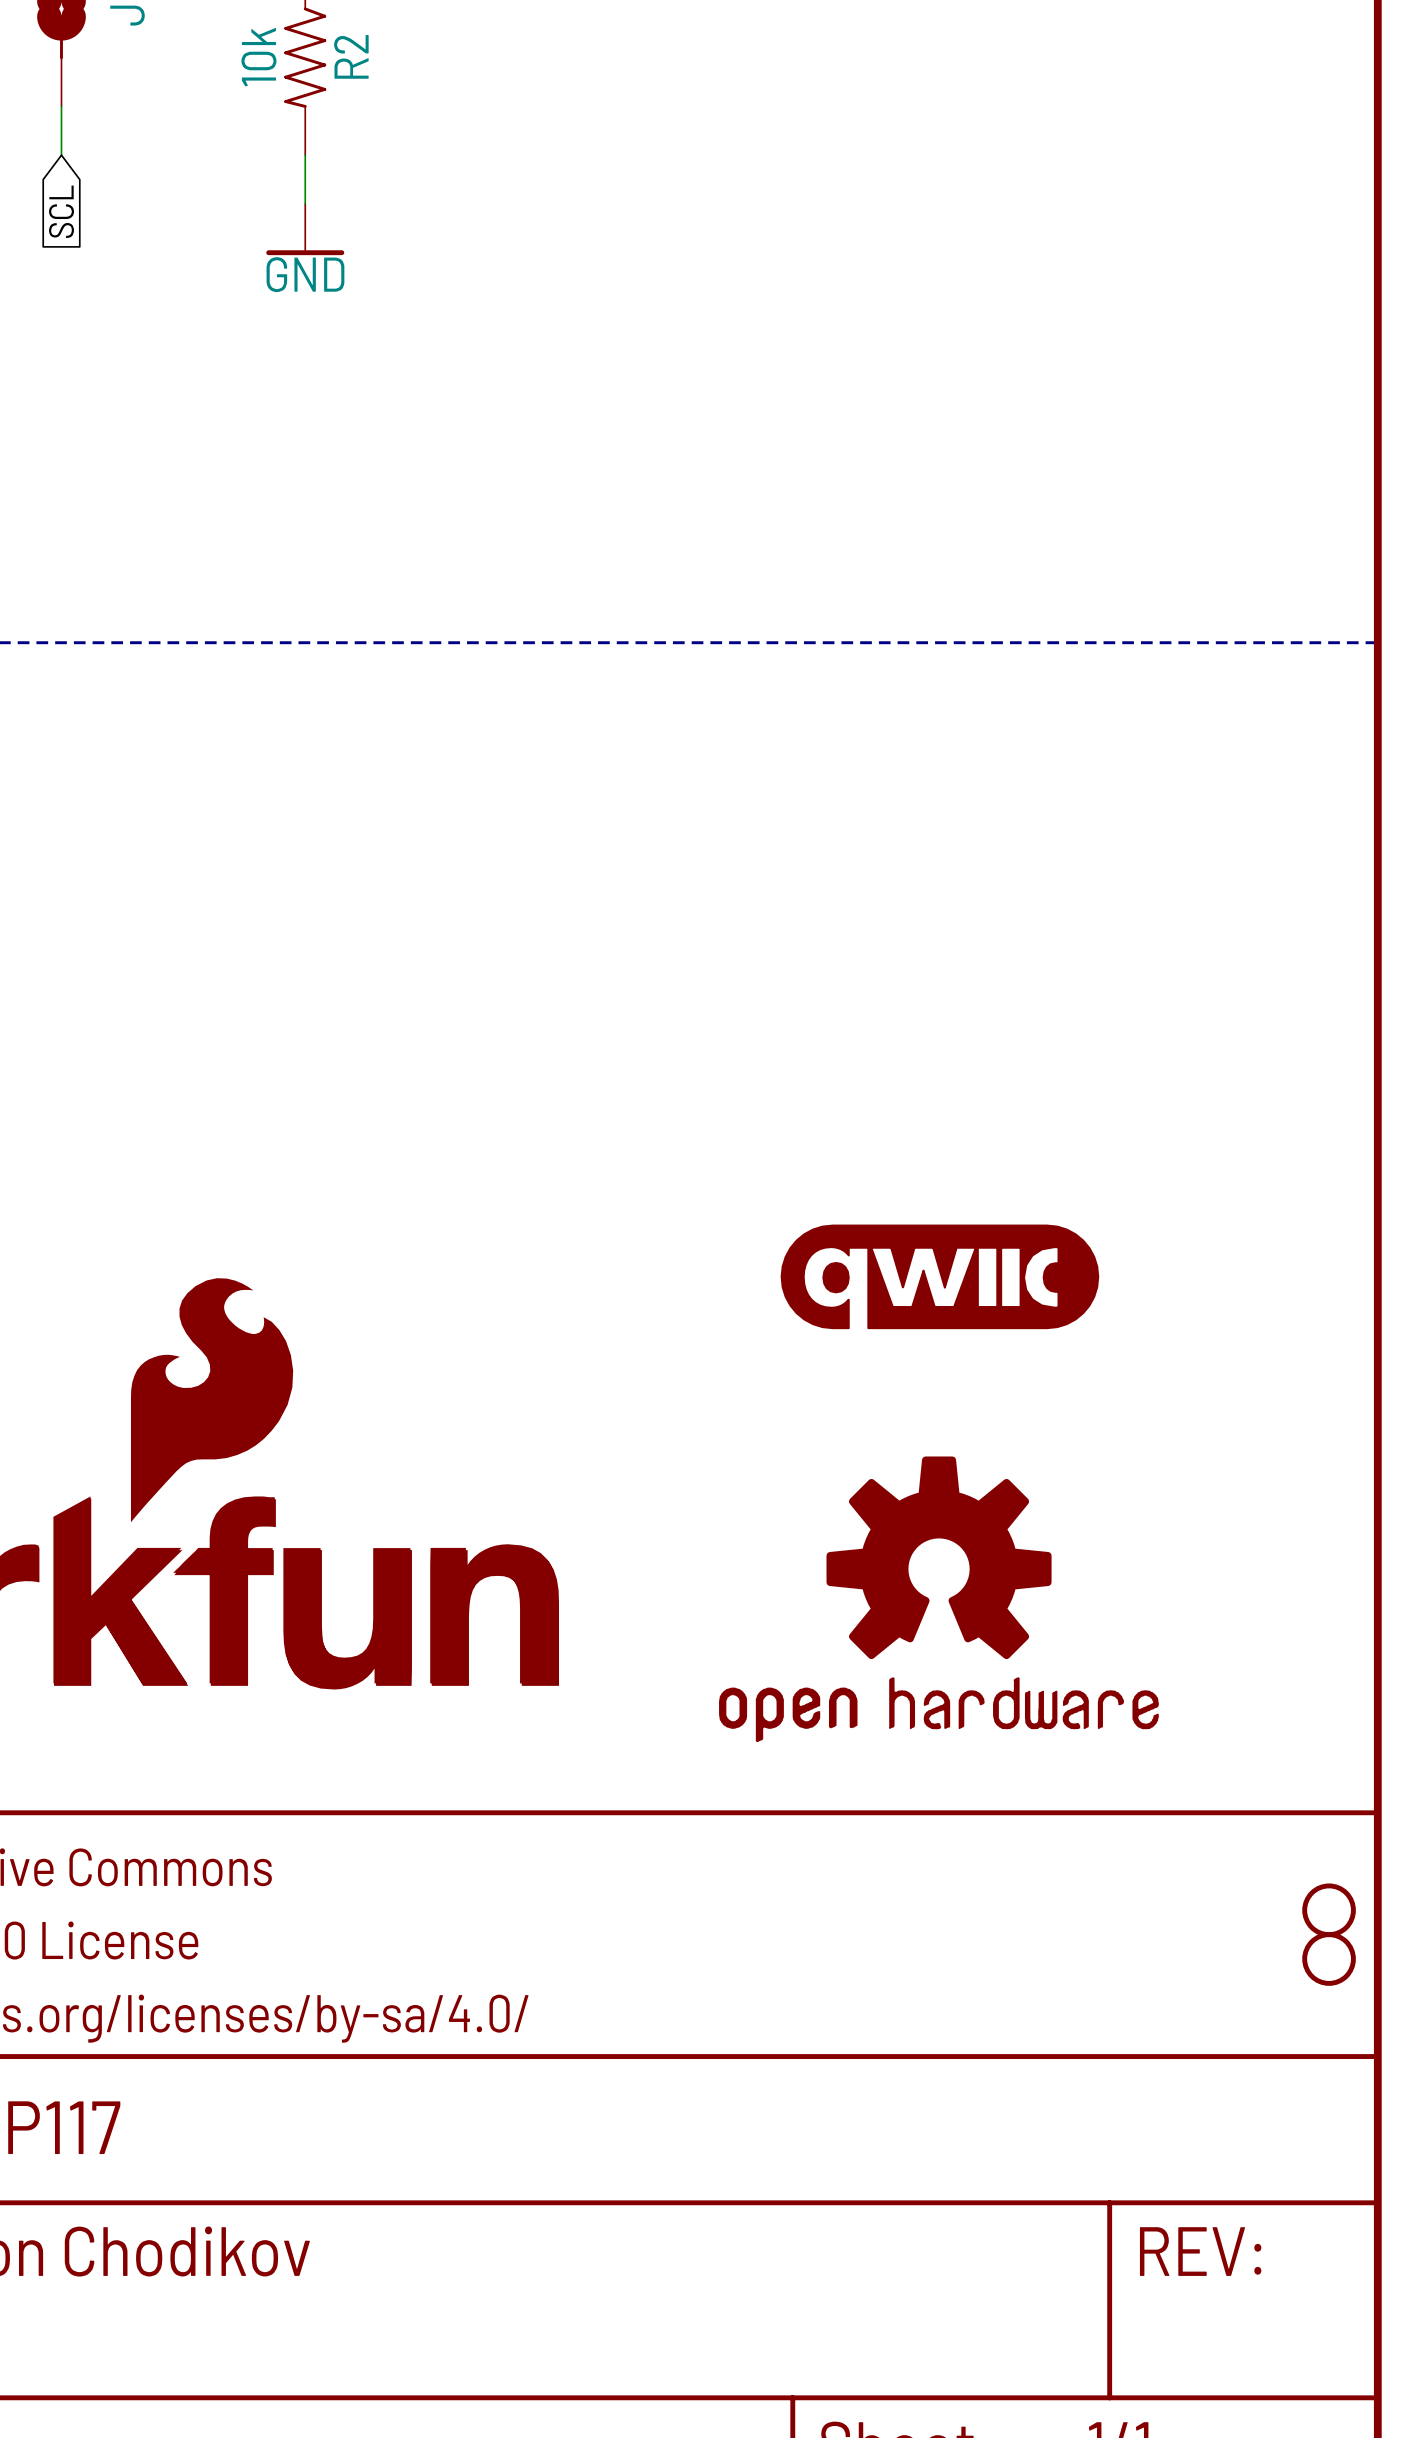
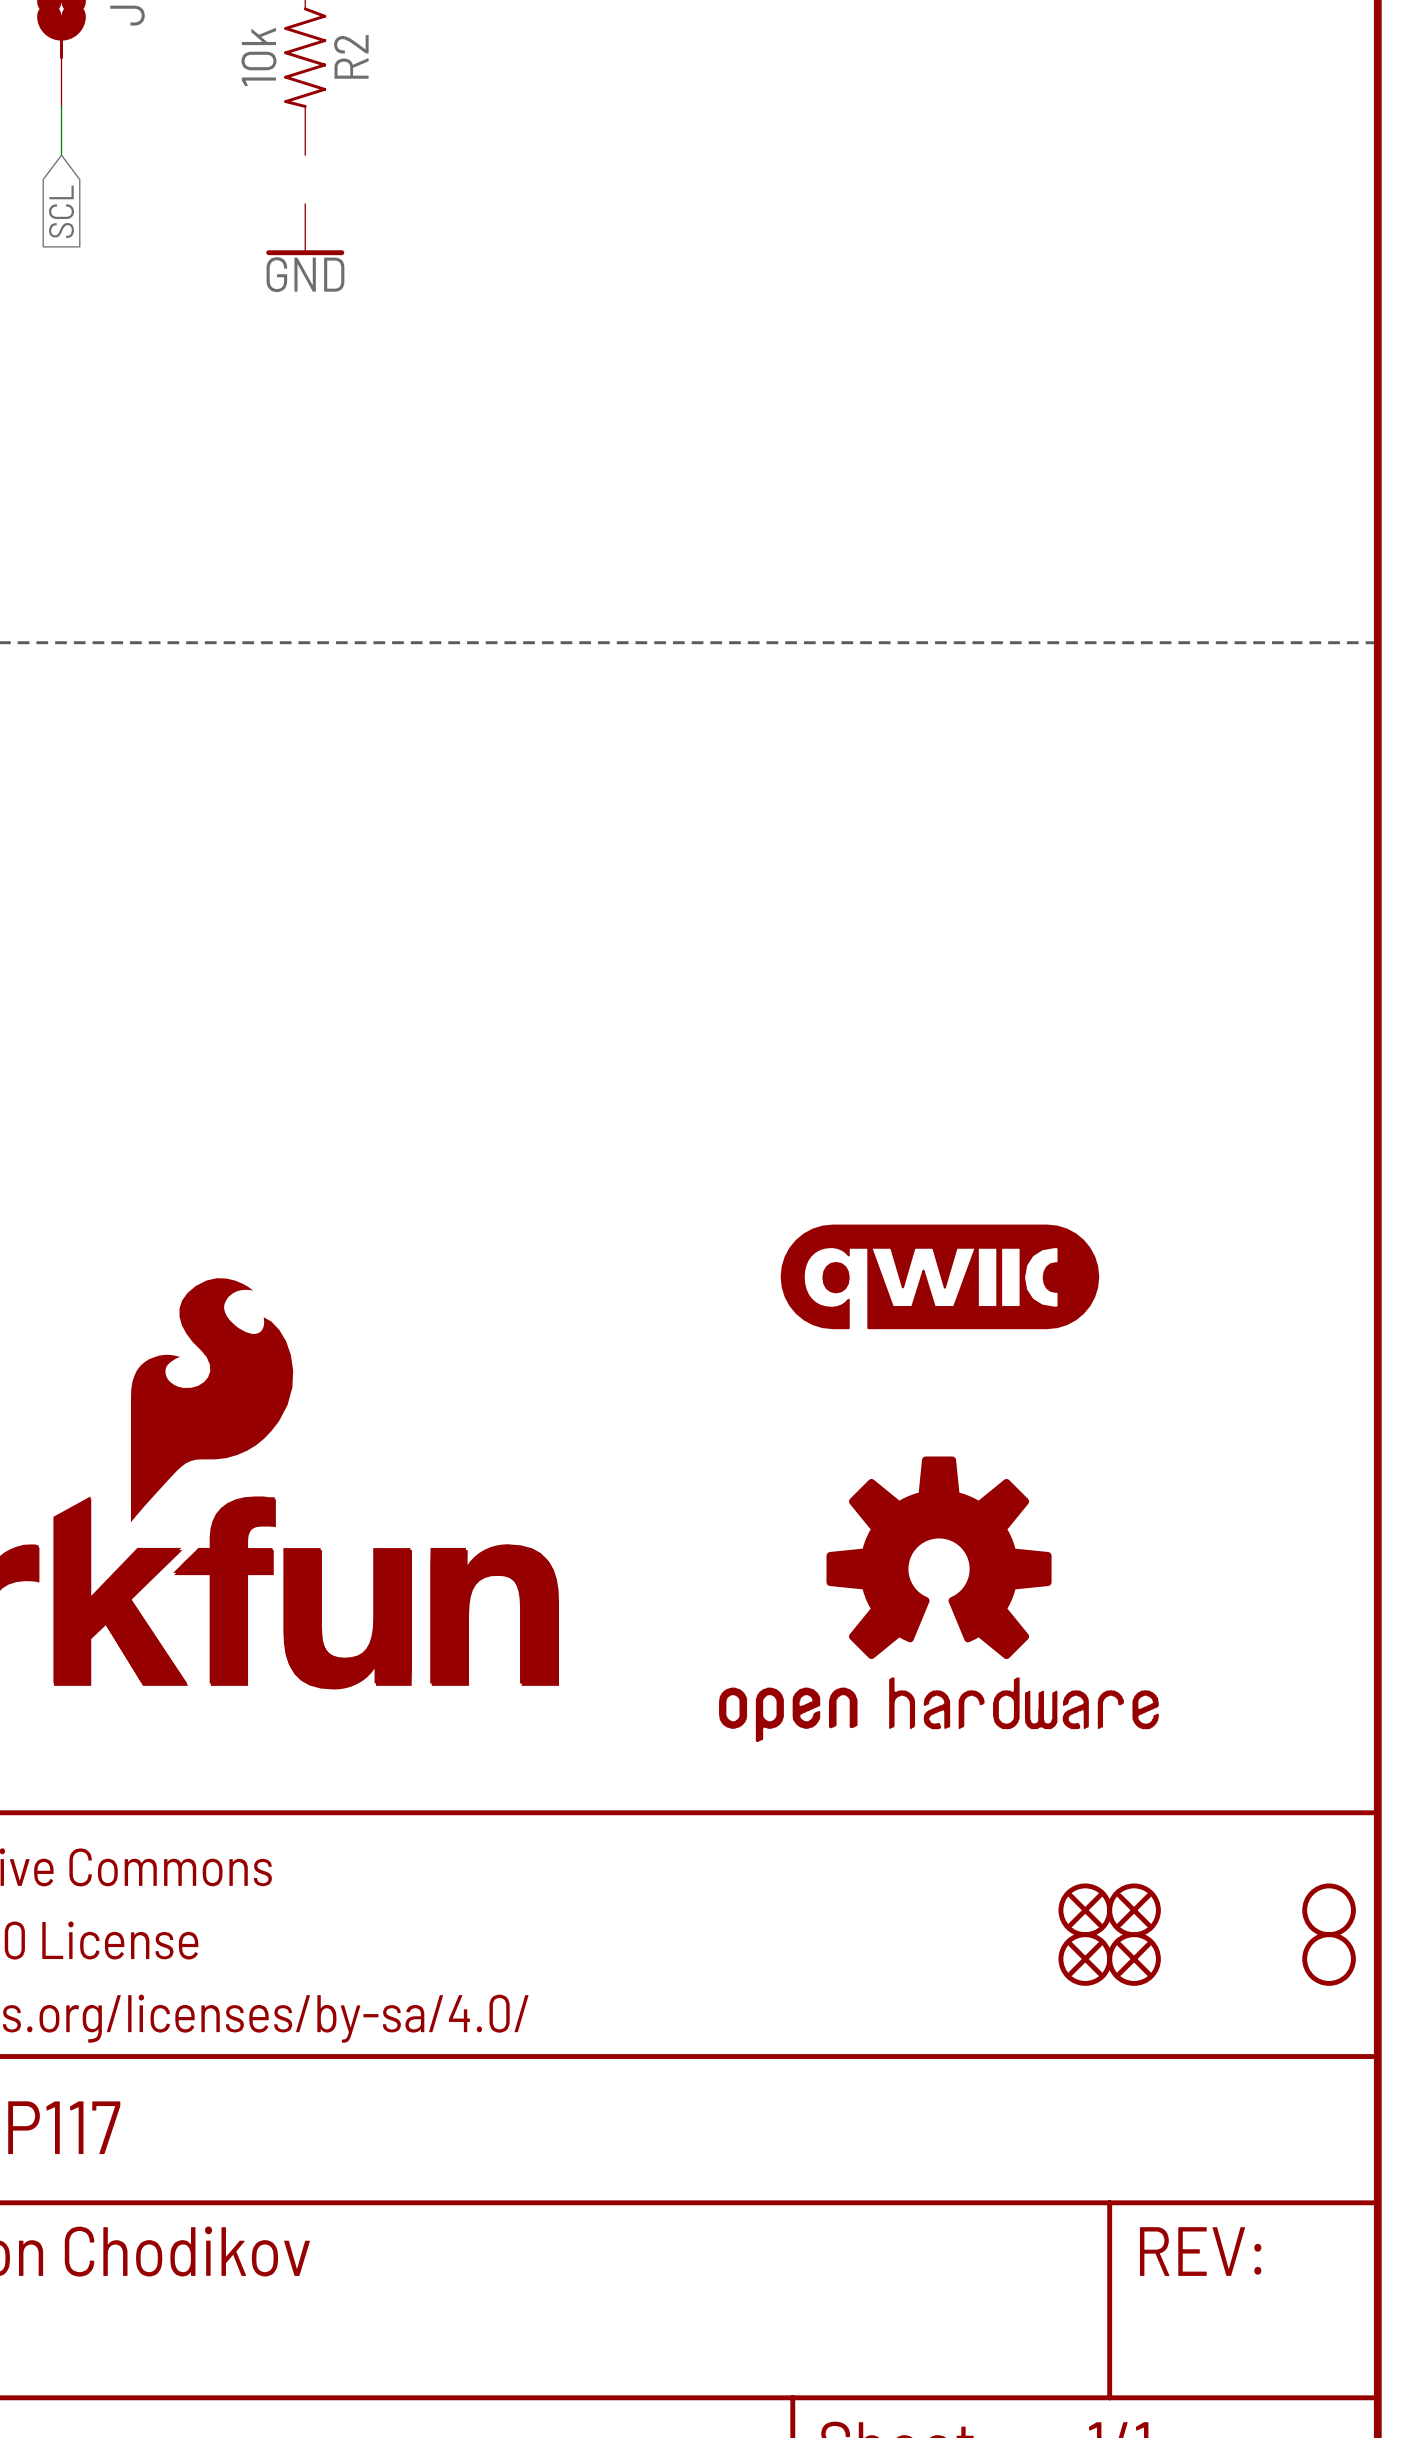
wire: (305, 155) (305, 203) -> none
part: none -> (1085, 1910)
part: none -> (1134, 1910)
part: none -> (1085, 1959)
part: none -> (1134, 1959)

